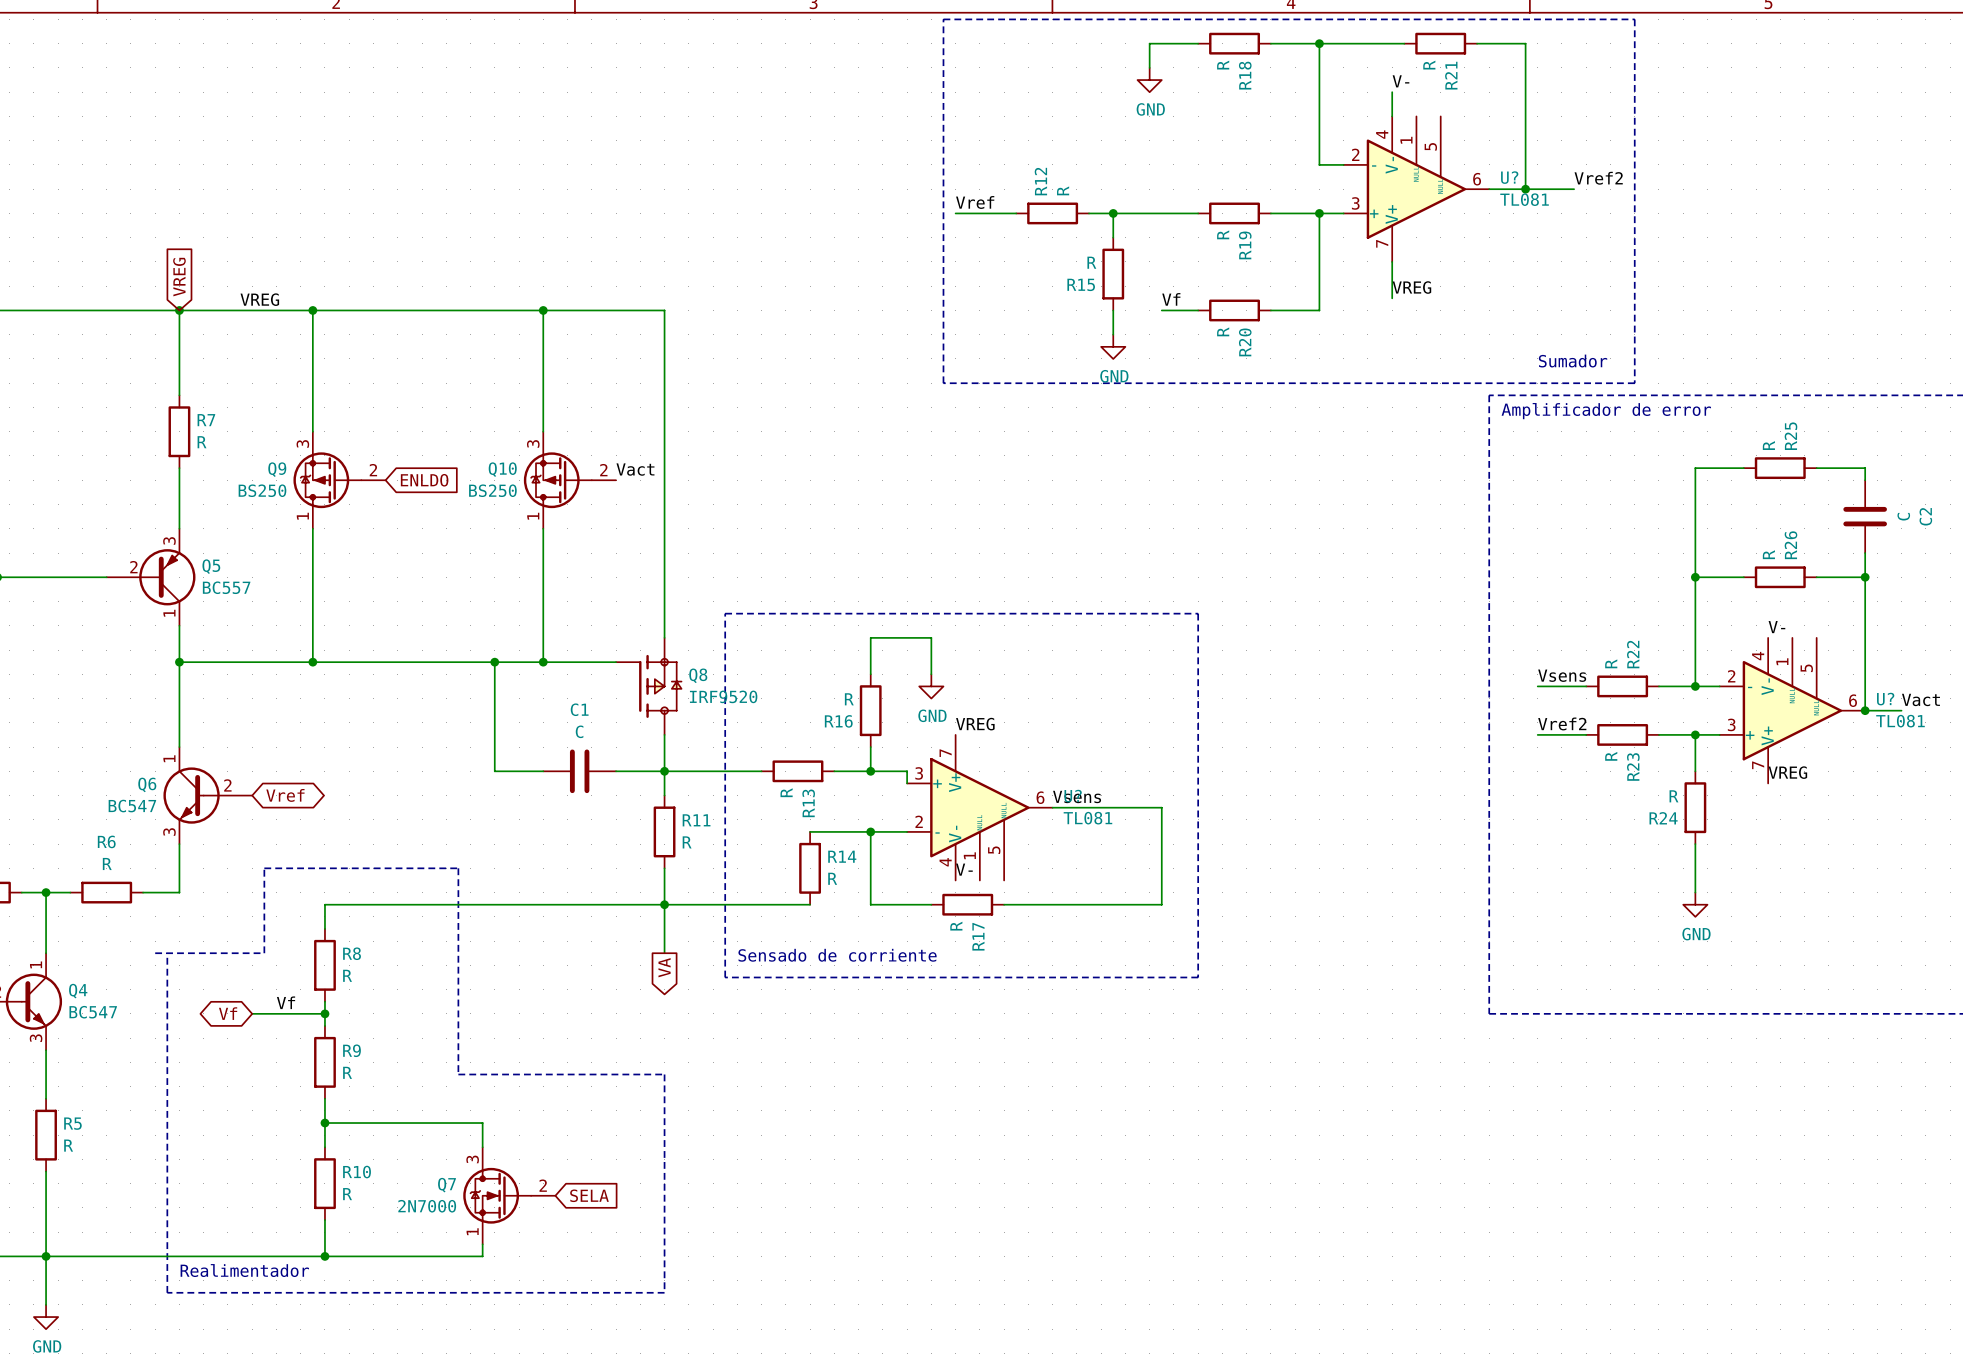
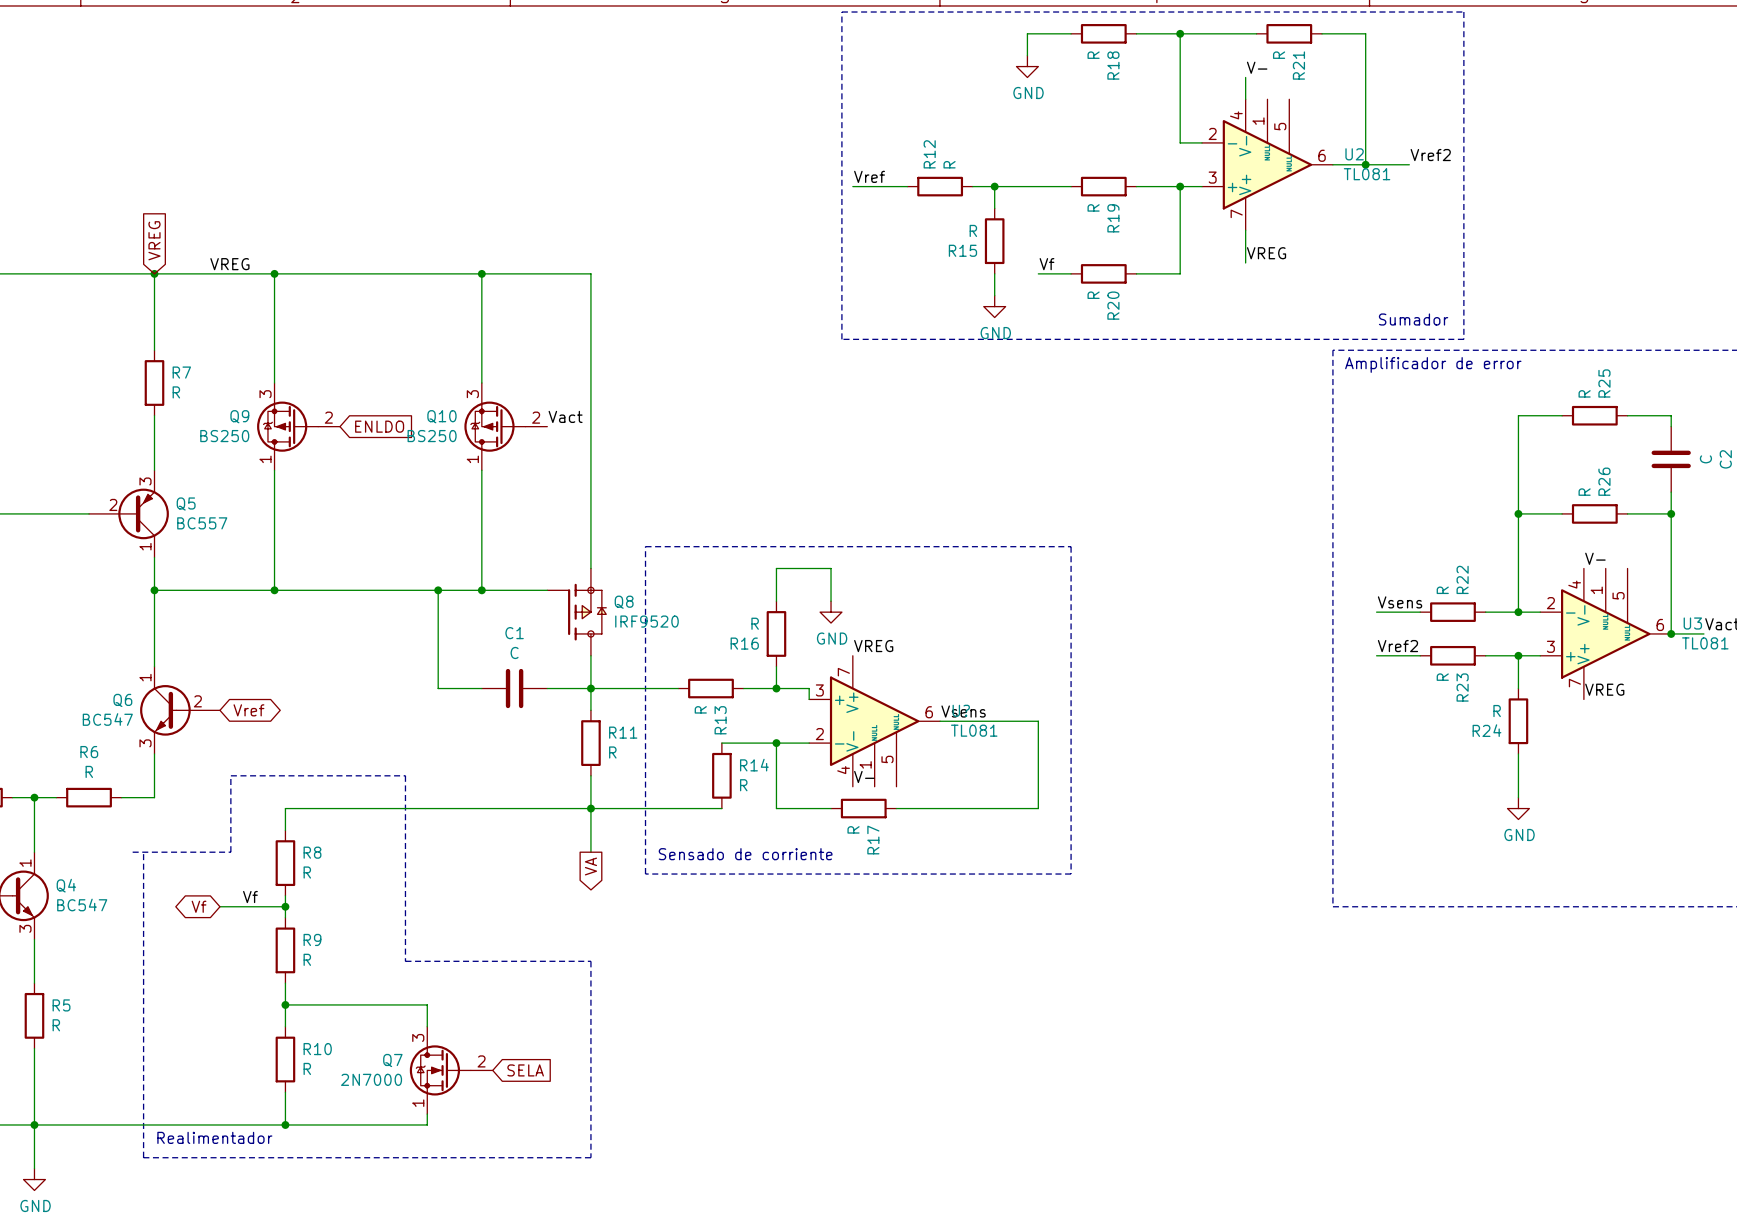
U? name: U? (1509, 177) -> U2 (1354, 154)
U? name: U? (1885, 699) -> U3 (1692, 623)

